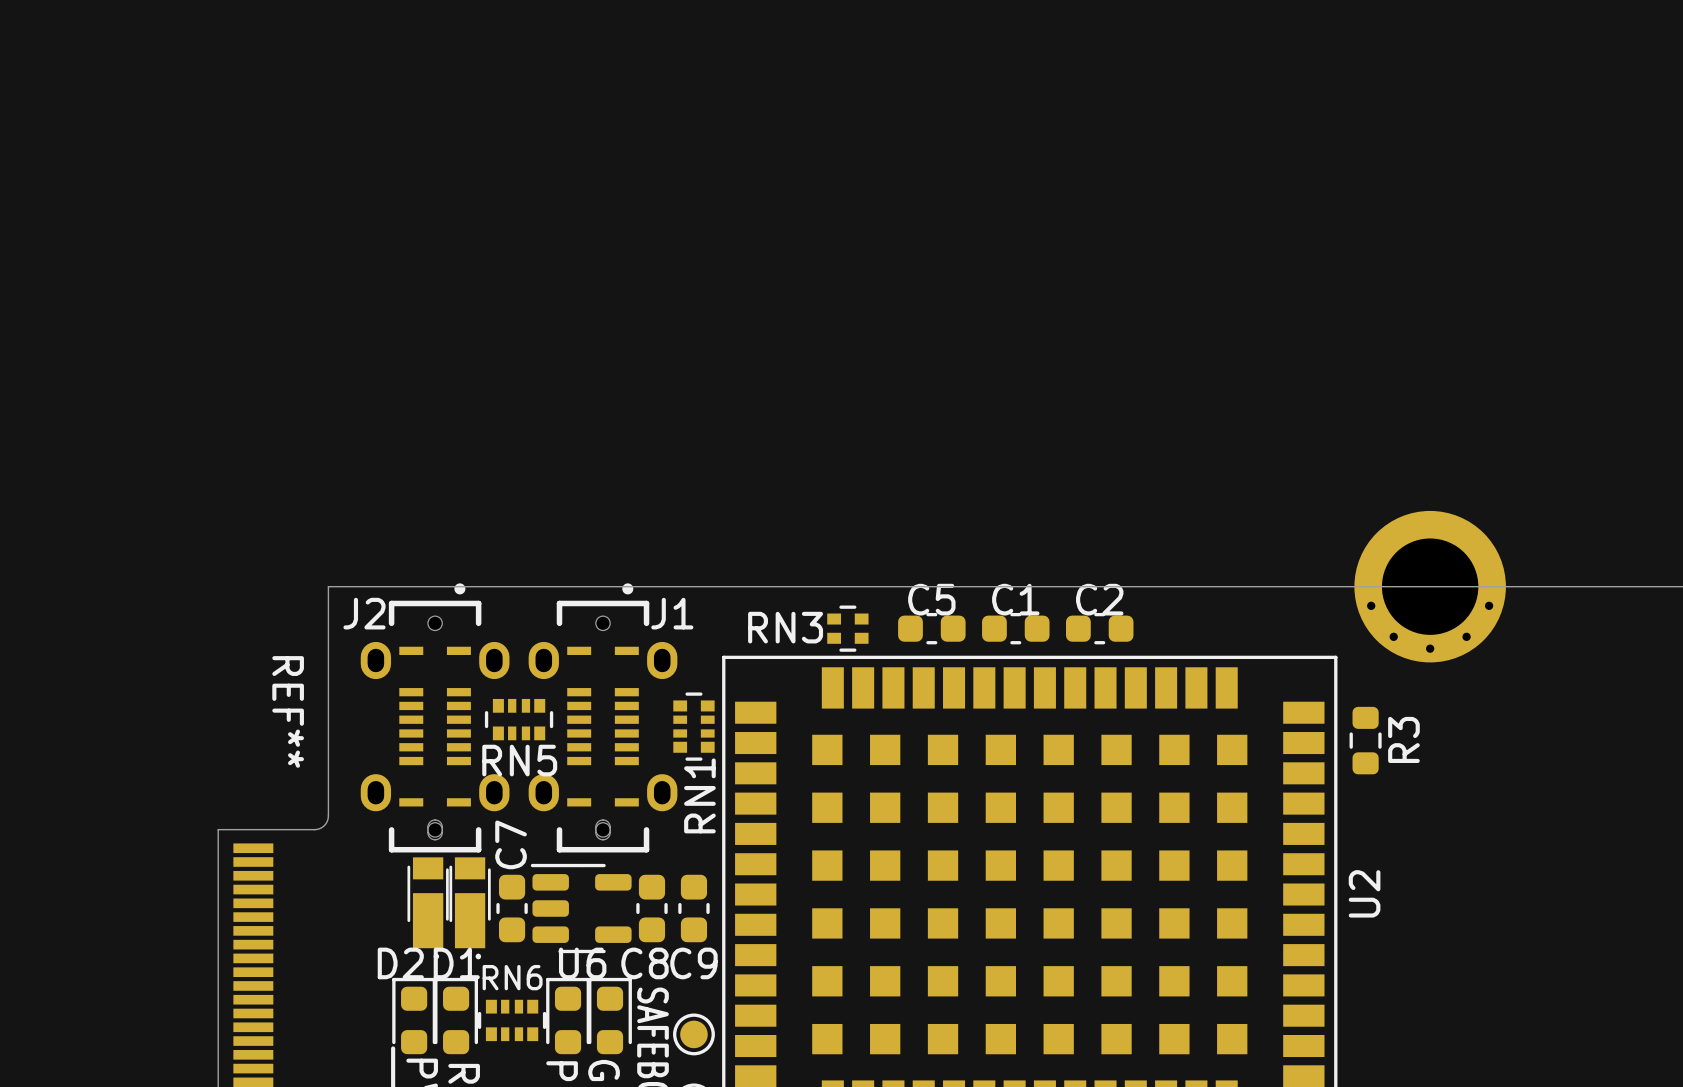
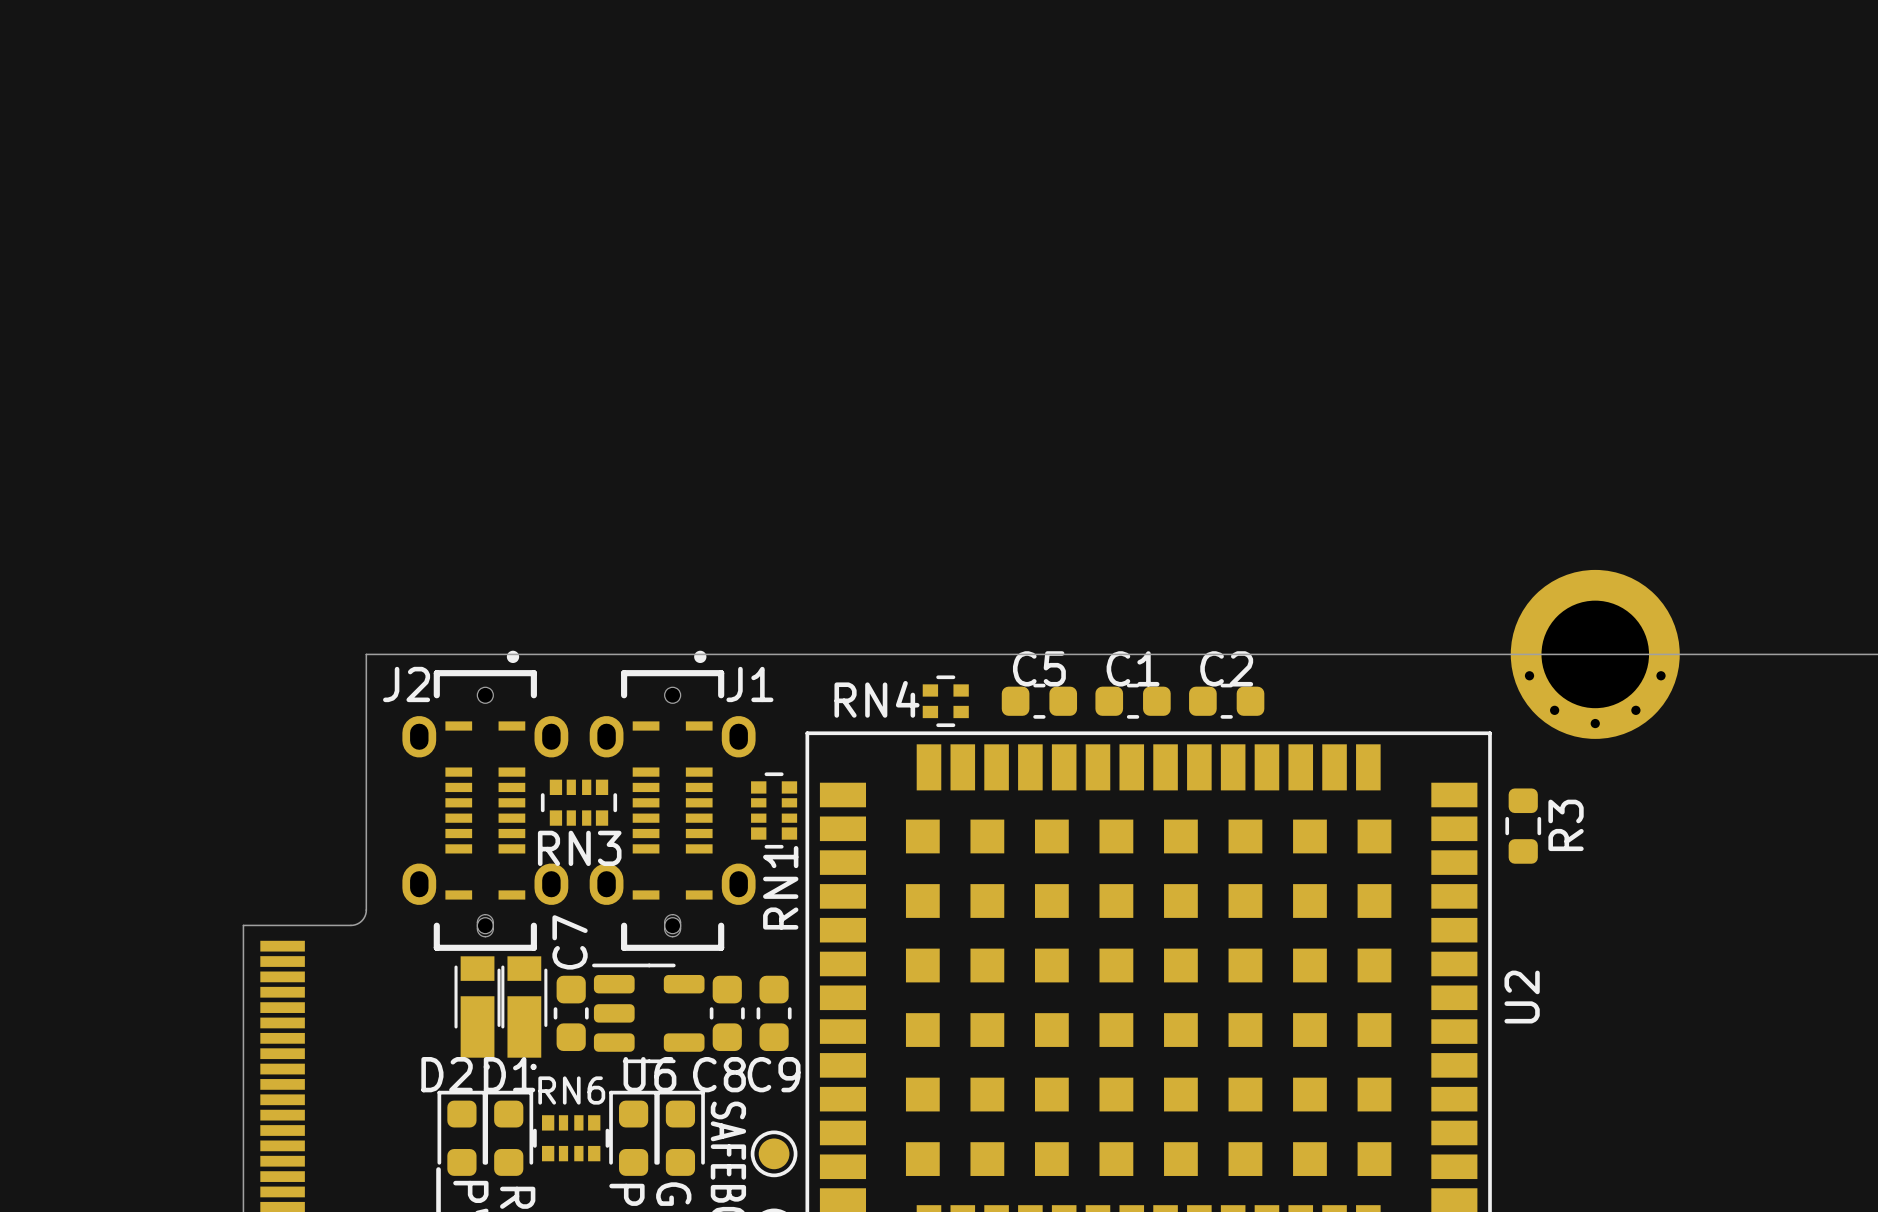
RN3 name: RN3 (785, 627) -> RN4 (876, 699)
REF** name: REF** (288, 711) -> none
RN5 name: RN5 (519, 760) -> RN3 (579, 848)

